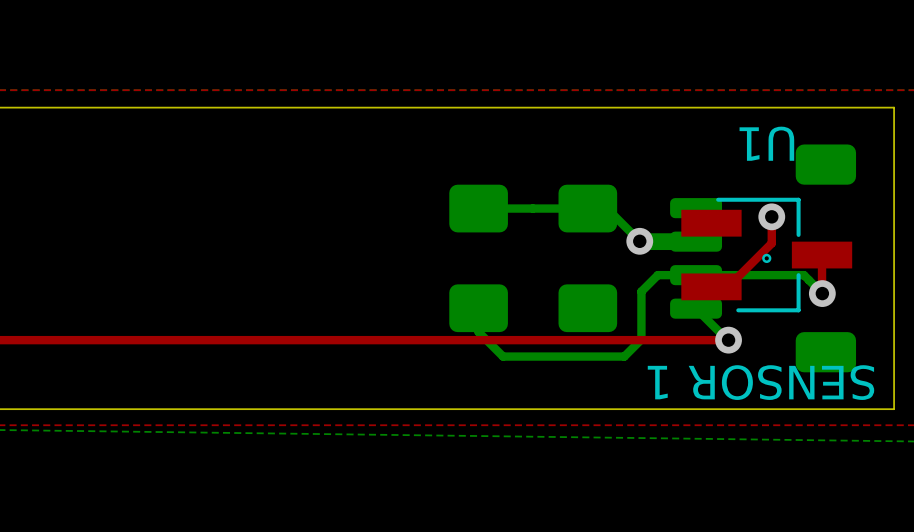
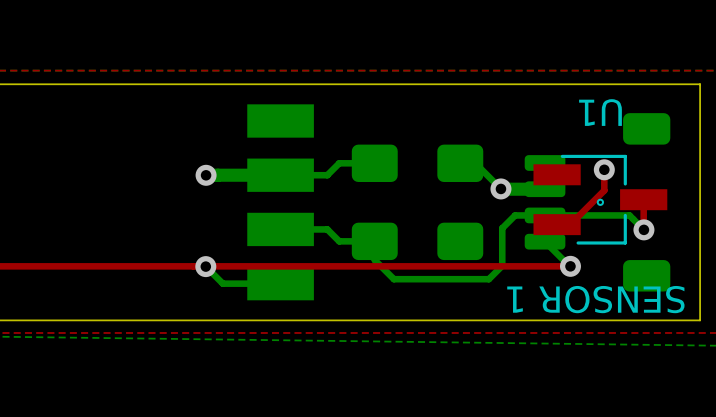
part: none -> (280, 121)
bottom track: (478, 208) (587, 208) -> (374, 163) (339, 163) (327, 175) (206, 175)
via: none -> (206, 175)
part: none -> (280, 175)
bottom track: none -> (280, 229) (327, 229) (339, 241) (374, 241)
part: none -> (280, 229)
bottom track: none -> (205, 266) (222, 283) (280, 283)
via: none -> (205, 266)
part: none -> (280, 283)

